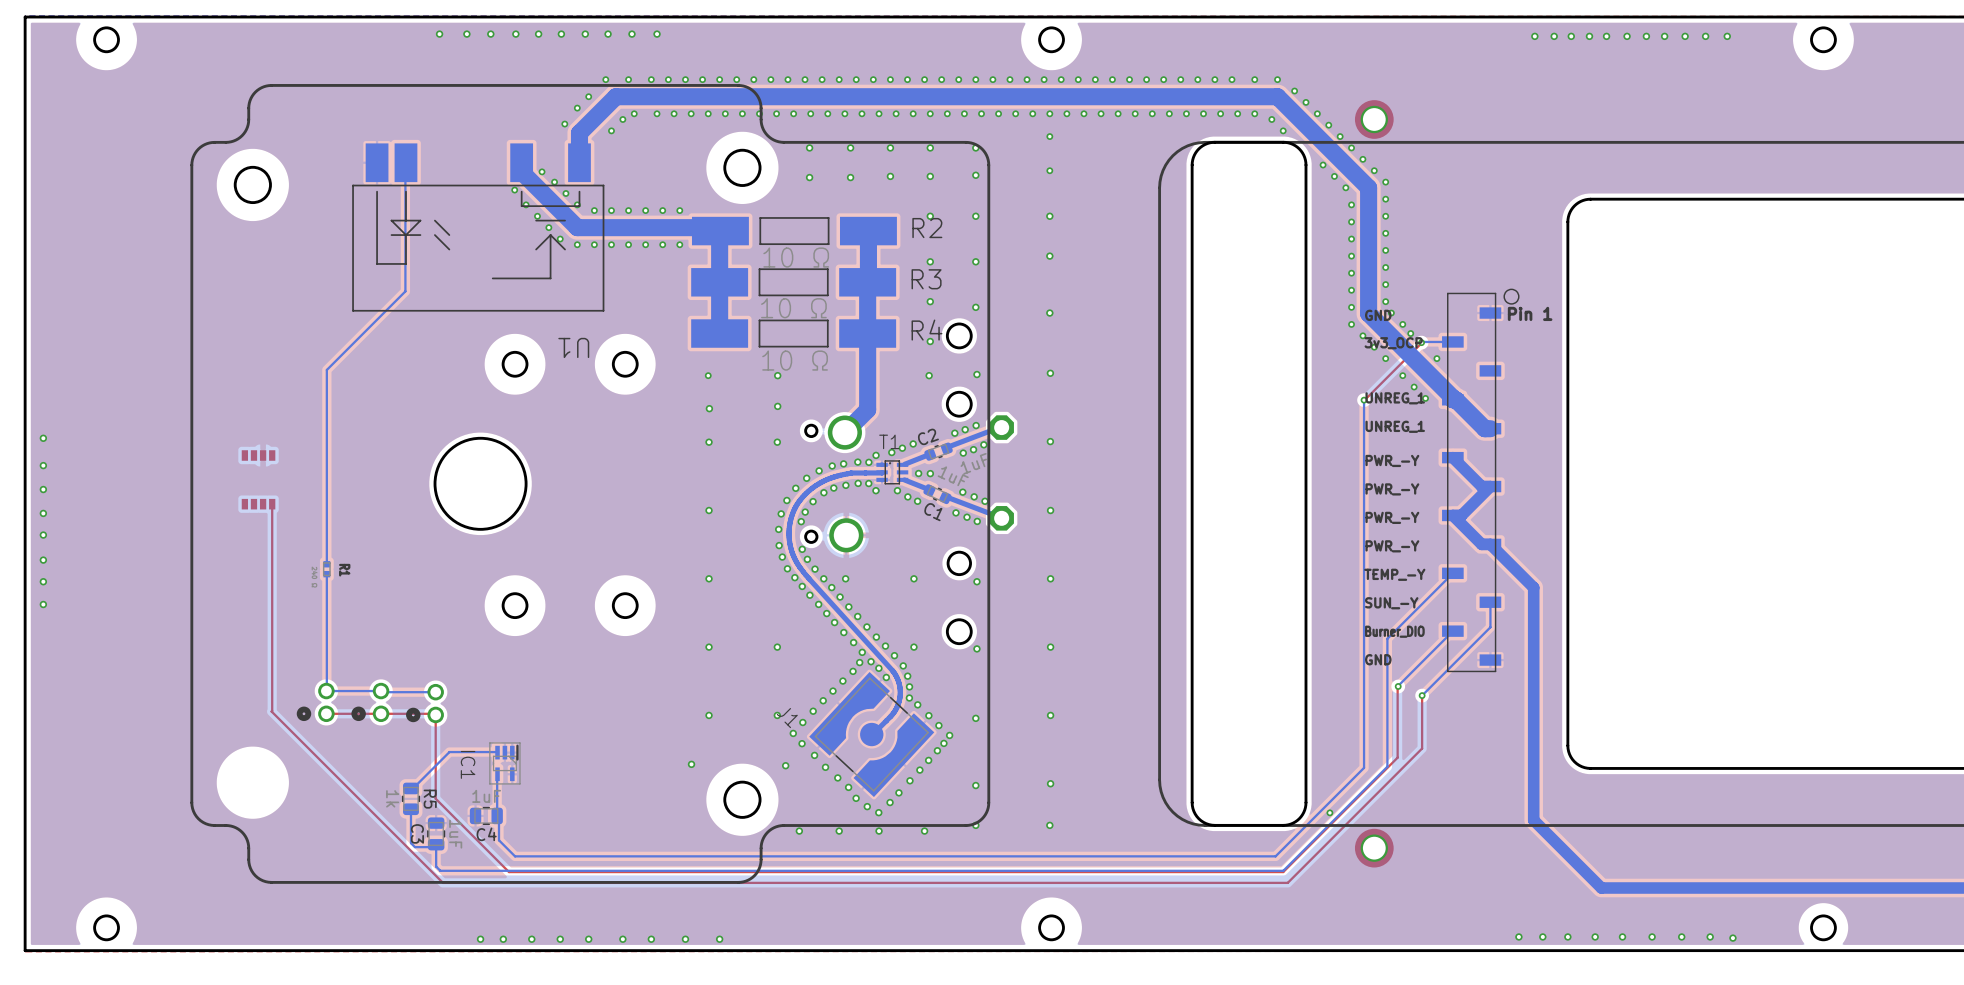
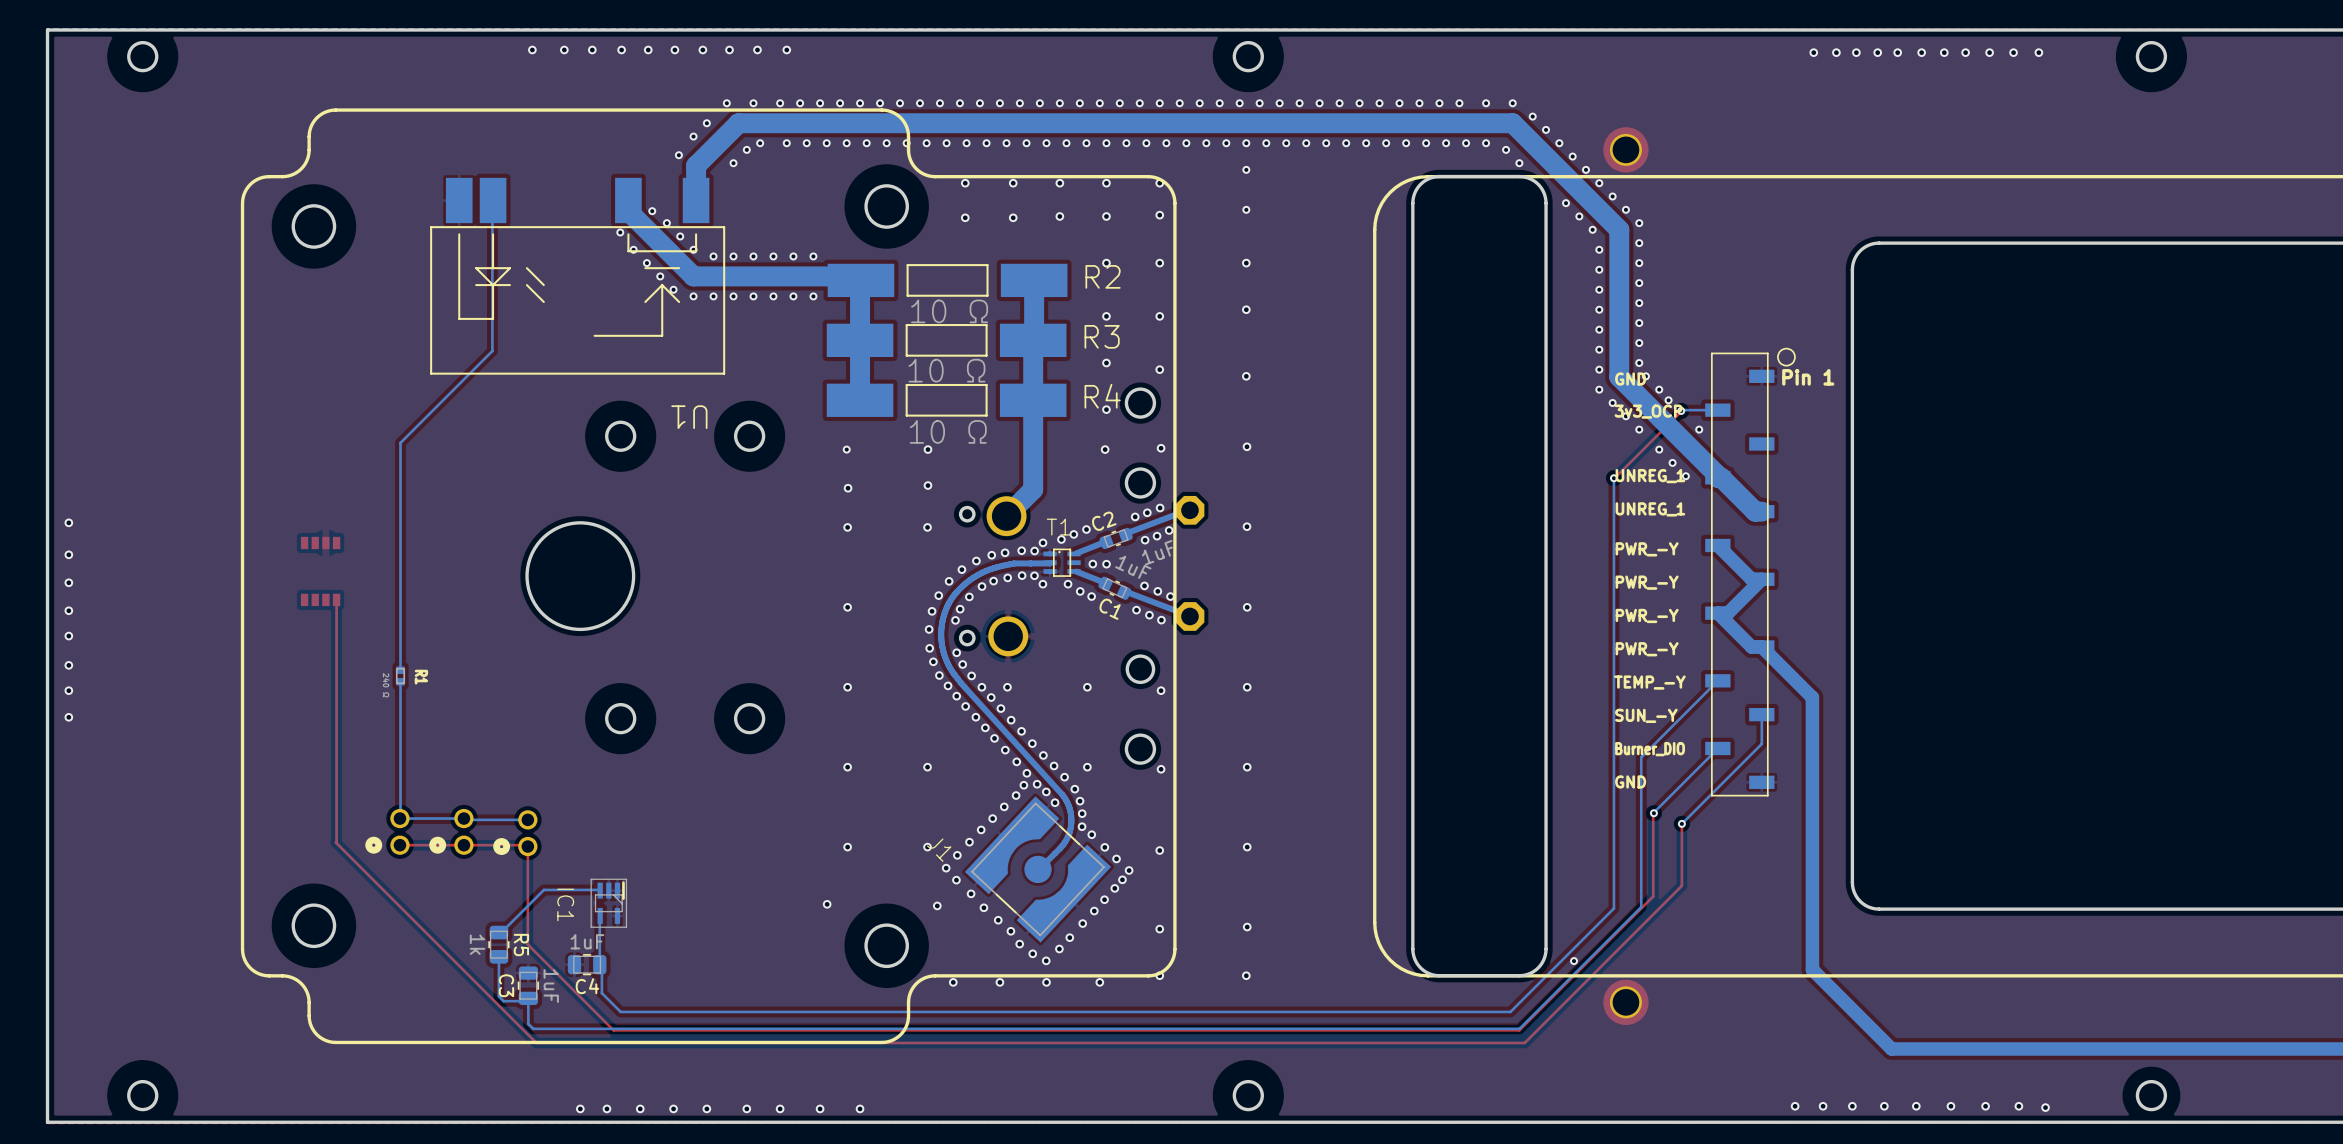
round board edge: none -> [291, 903, 337, 949]

